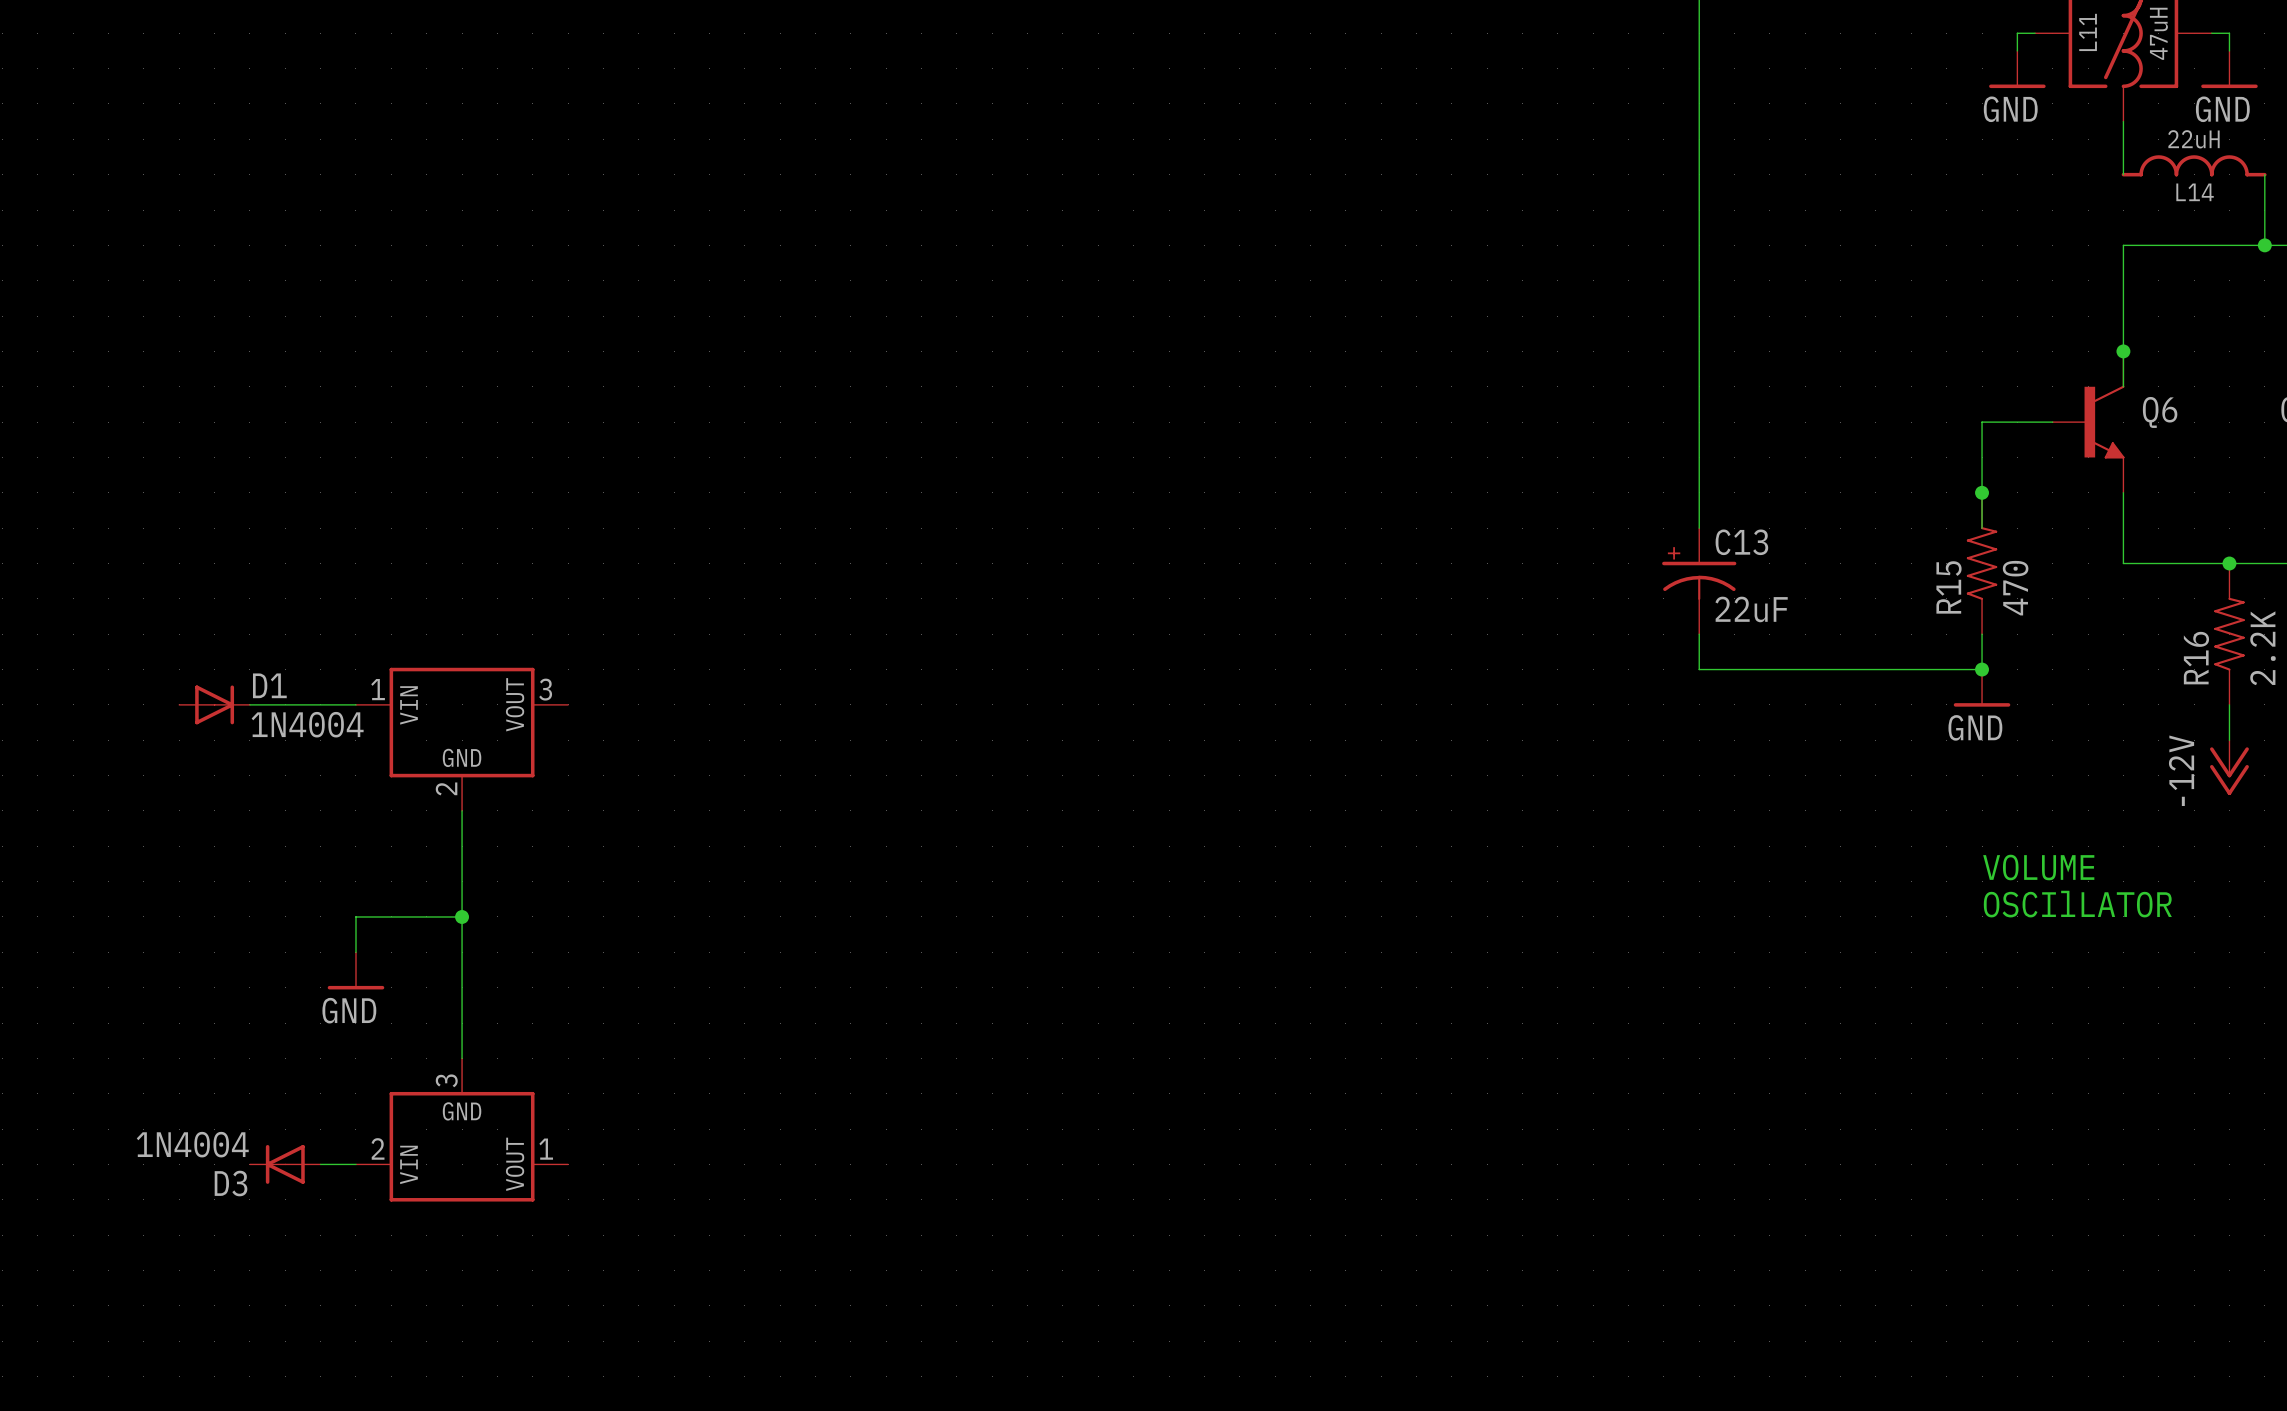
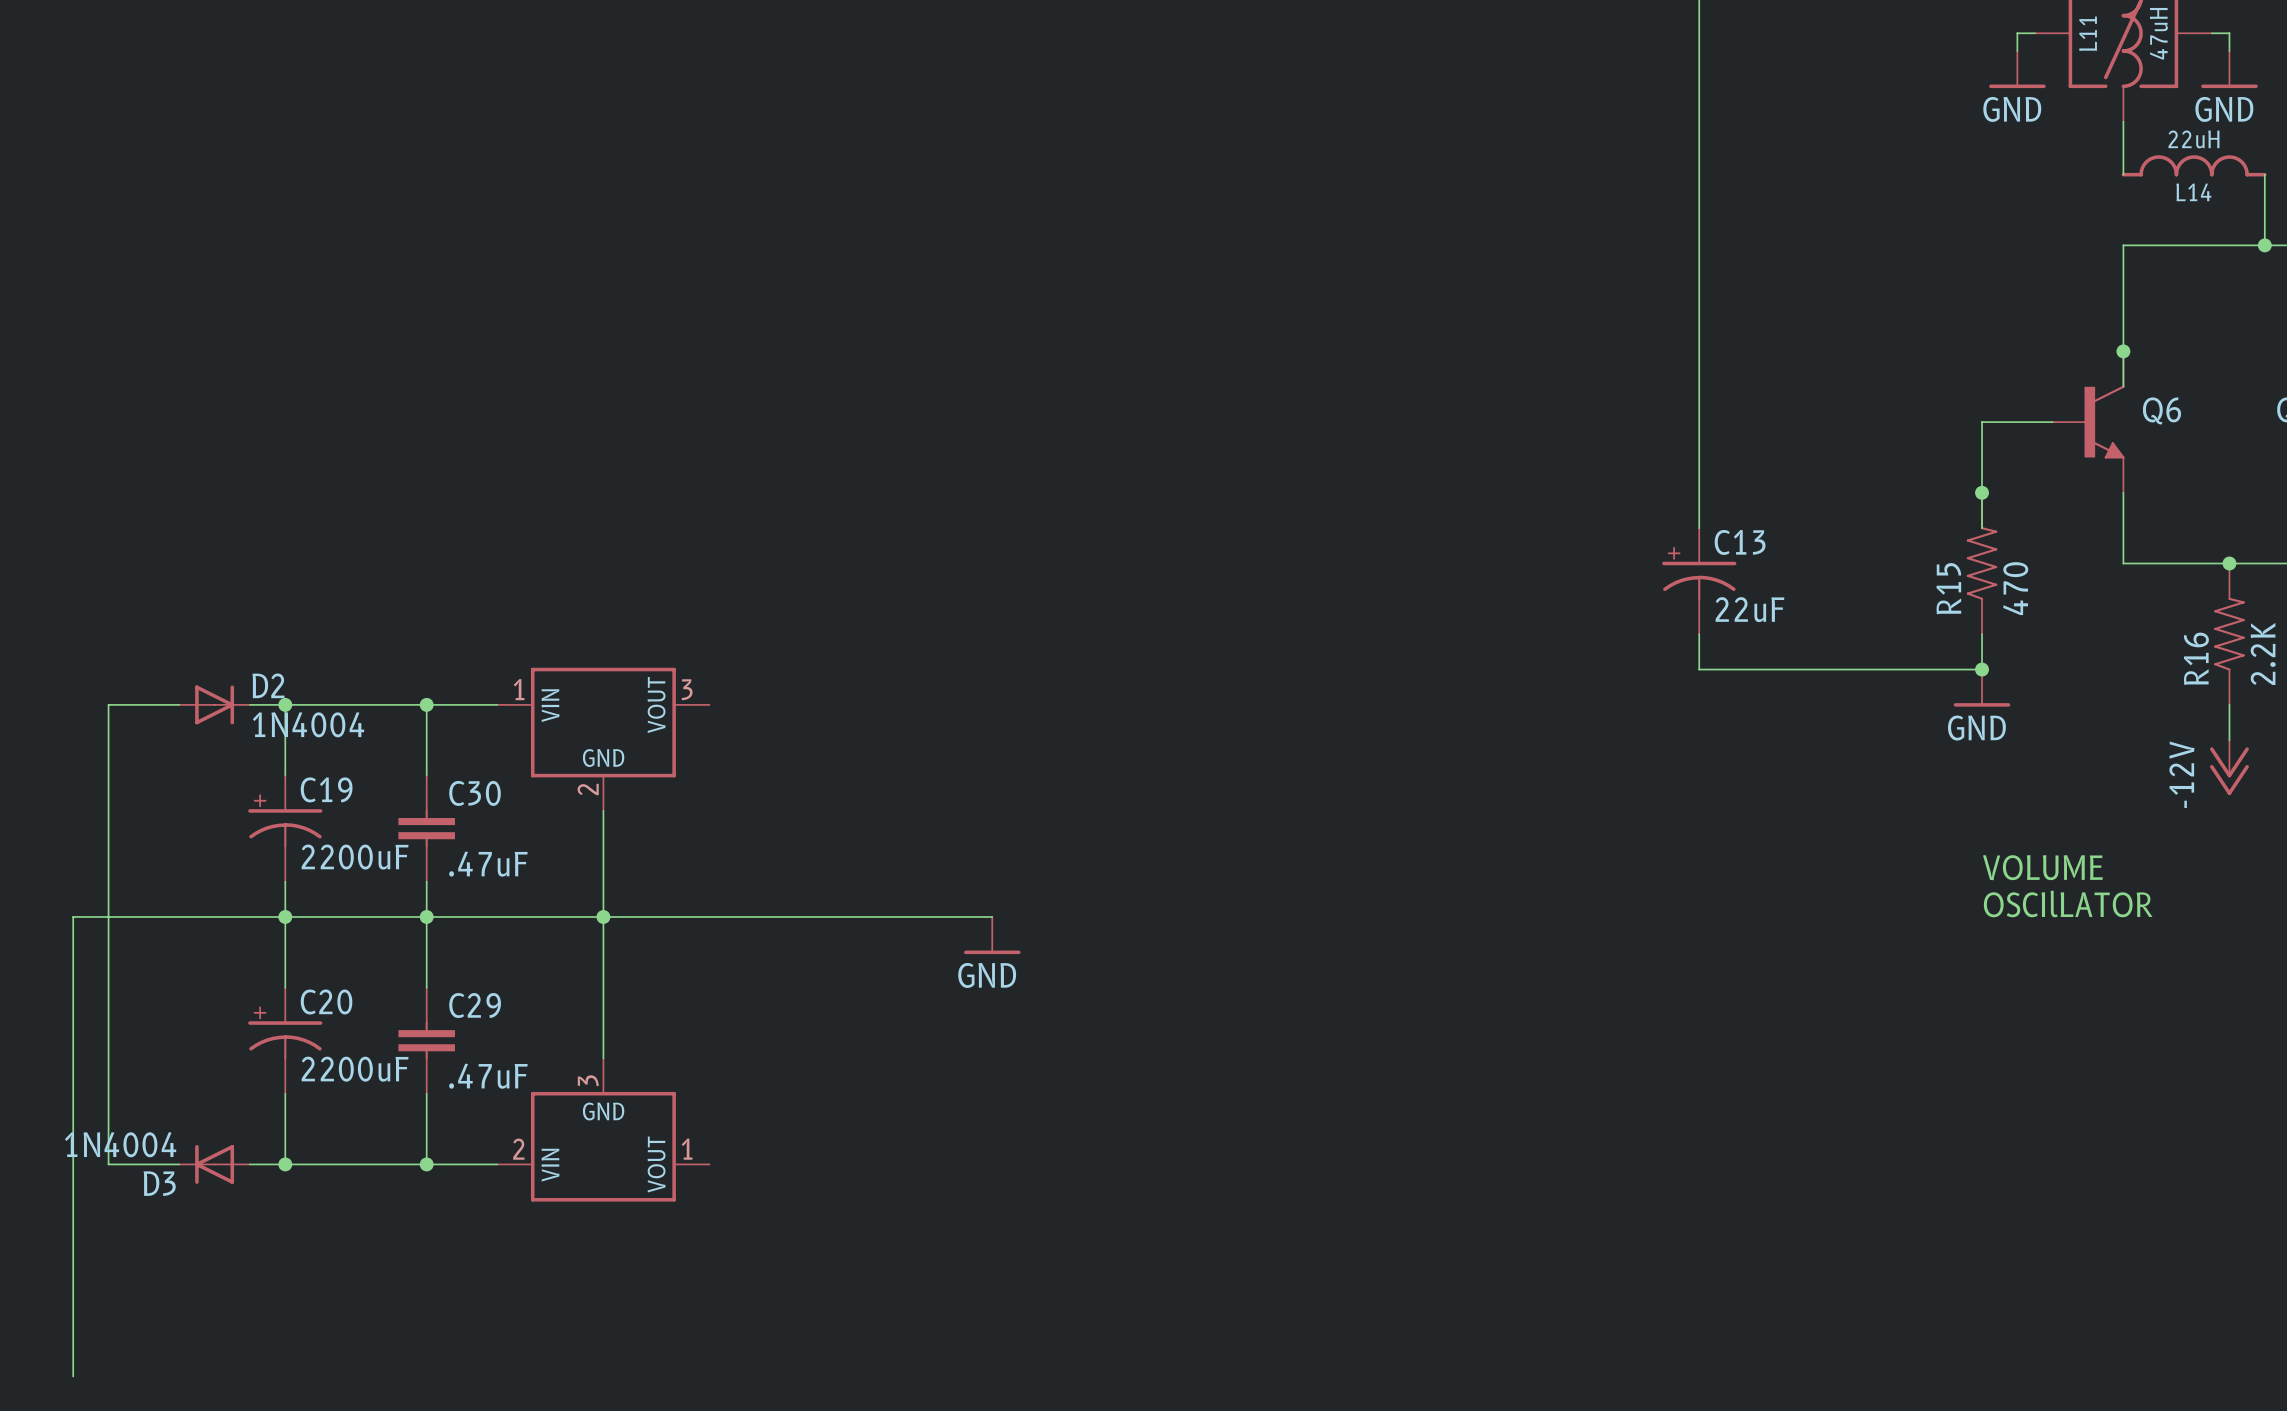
D1 name: D1 (269, 685) -> D2 (268, 685)
wire: none -> (179, 704) (108, 704) (108, 1164) (179, 1164)
wire: none -> (285, 704) (285, 775)
junction: none -> (285, 704)
wire: none -> (355, 704) (497, 704)
wire: none -> (426, 704) (426, 775)
junction: none -> (426, 704)
part position: (462, 739) -> (603, 739)
wire: (462, 810) (462, 1058) -> (603, 810) (603, 1058)
C19: none -> 2200uF (285, 828)
C30: none -> .47uF (426, 828)
wire: none -> (285, 881) (285, 987)
wire: none -> (426, 881) (426, 987)
junction: none -> (285, 916)
wire: (355, 916) (355, 952) -> (355, 916) (73, 916) (73, 1376)
wire: none -> (462, 916) (992, 916)
junction position: (462, 916) -> (426, 916)
junction: none -> (603, 916)
power symbol: none -> GND (992, 935)
power symbol: GND (355, 970) -> none
C20: none -> 2200uF (285, 1040)
C29: none -> .47uF (426, 1040)
wire: none -> (285, 1093) (285, 1164)
wire: none -> (426, 1093) (426, 1164)
part position: (462, 1129) -> (603, 1129)
D3 position: (285, 1164) -> (214, 1164)
junction: none -> (285, 1164)
wire: none -> (355, 1164) (497, 1164)
junction: none -> (426, 1164)

